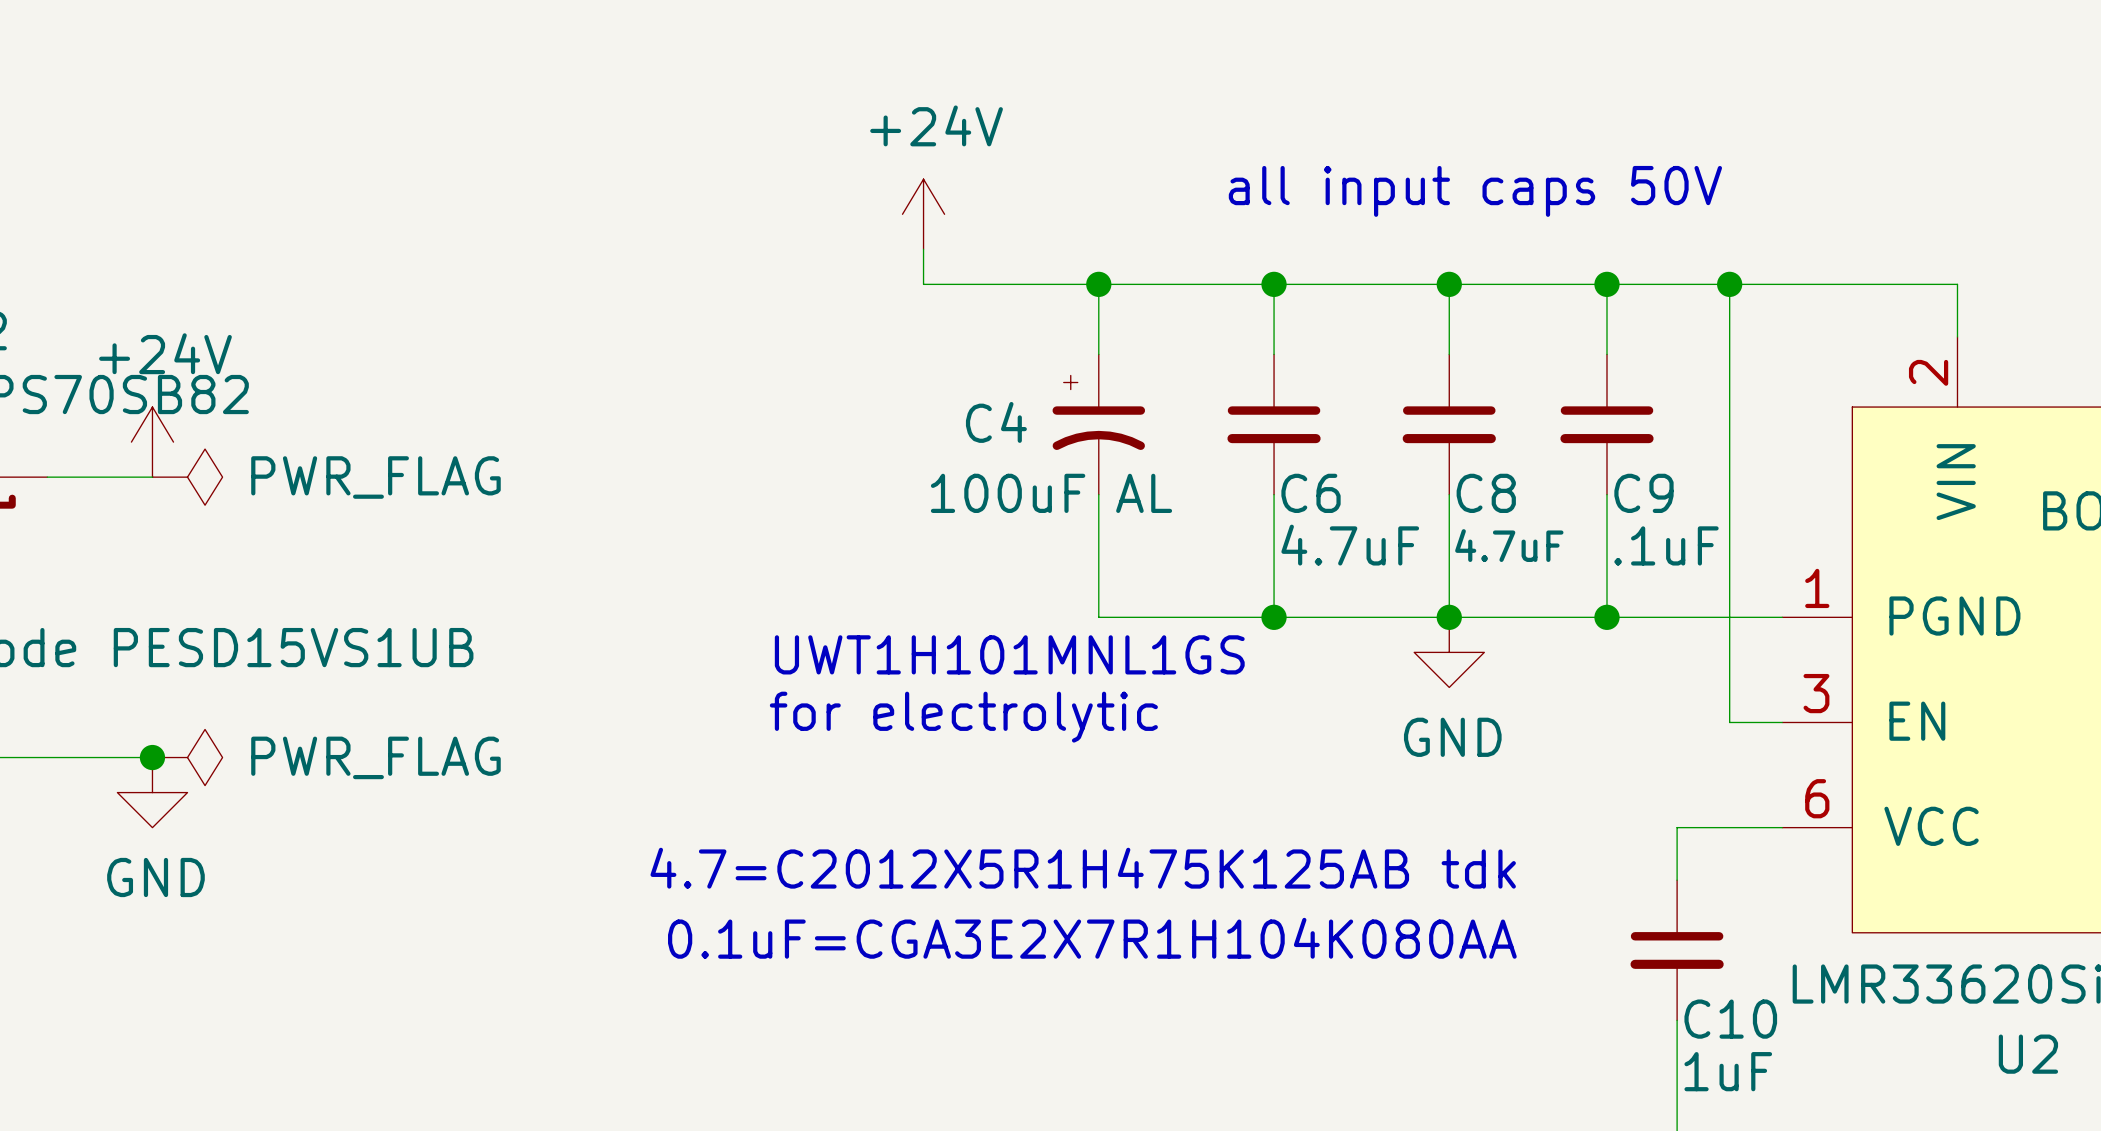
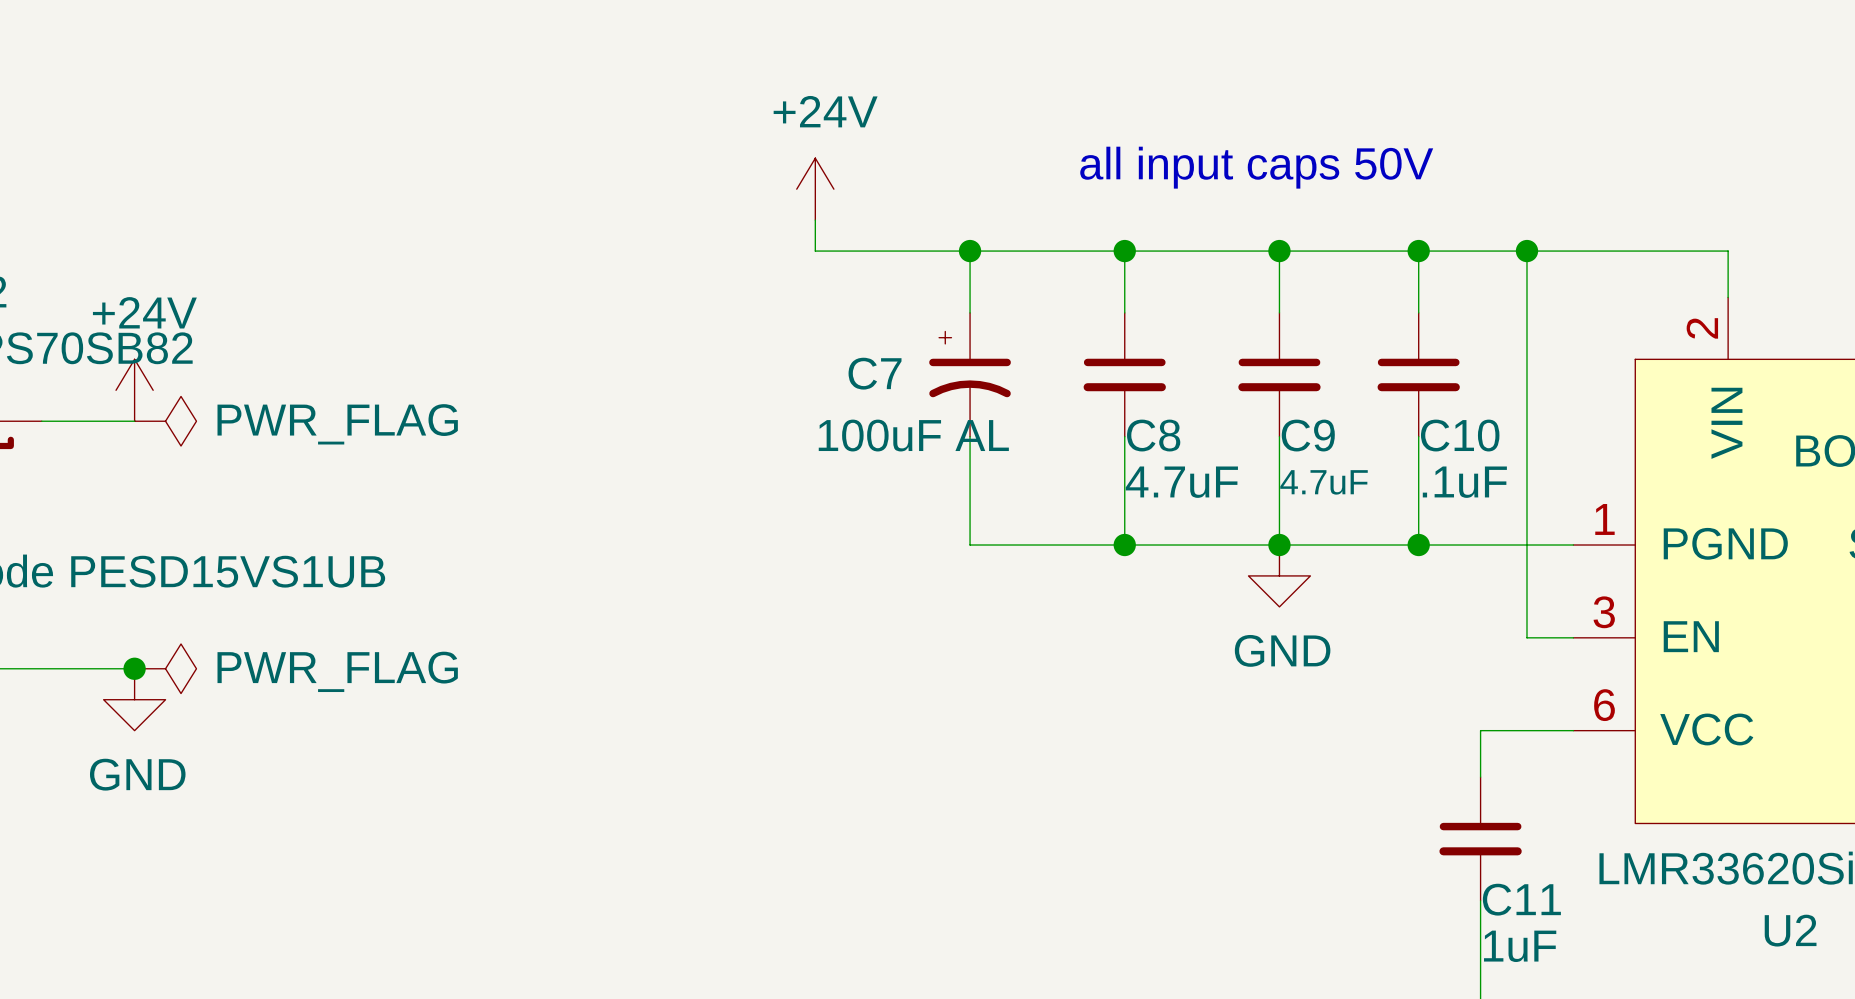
C4 name: C4 (996, 422) -> C7 (875, 373)
C6 name: C6 (1311, 493) -> C8 (1153, 435)
C8 name: C8 (1486, 493) -> C9 (1308, 435)
C9 name: C9 (1643, 493) -> C10 (1460, 435)
text: UWT1H101MNL1GS (1009, 654) -> none
text: for electrolytic (963, 717) -> none
text: 4.7=C2012X5R1H475K125AB tdk (1083, 868) -> none
text: 0.1uF=CGA3E2X7R1H104K080AA (1092, 938) -> none
C10 name: C10 (1730, 1019) -> C11 (1521, 899)

